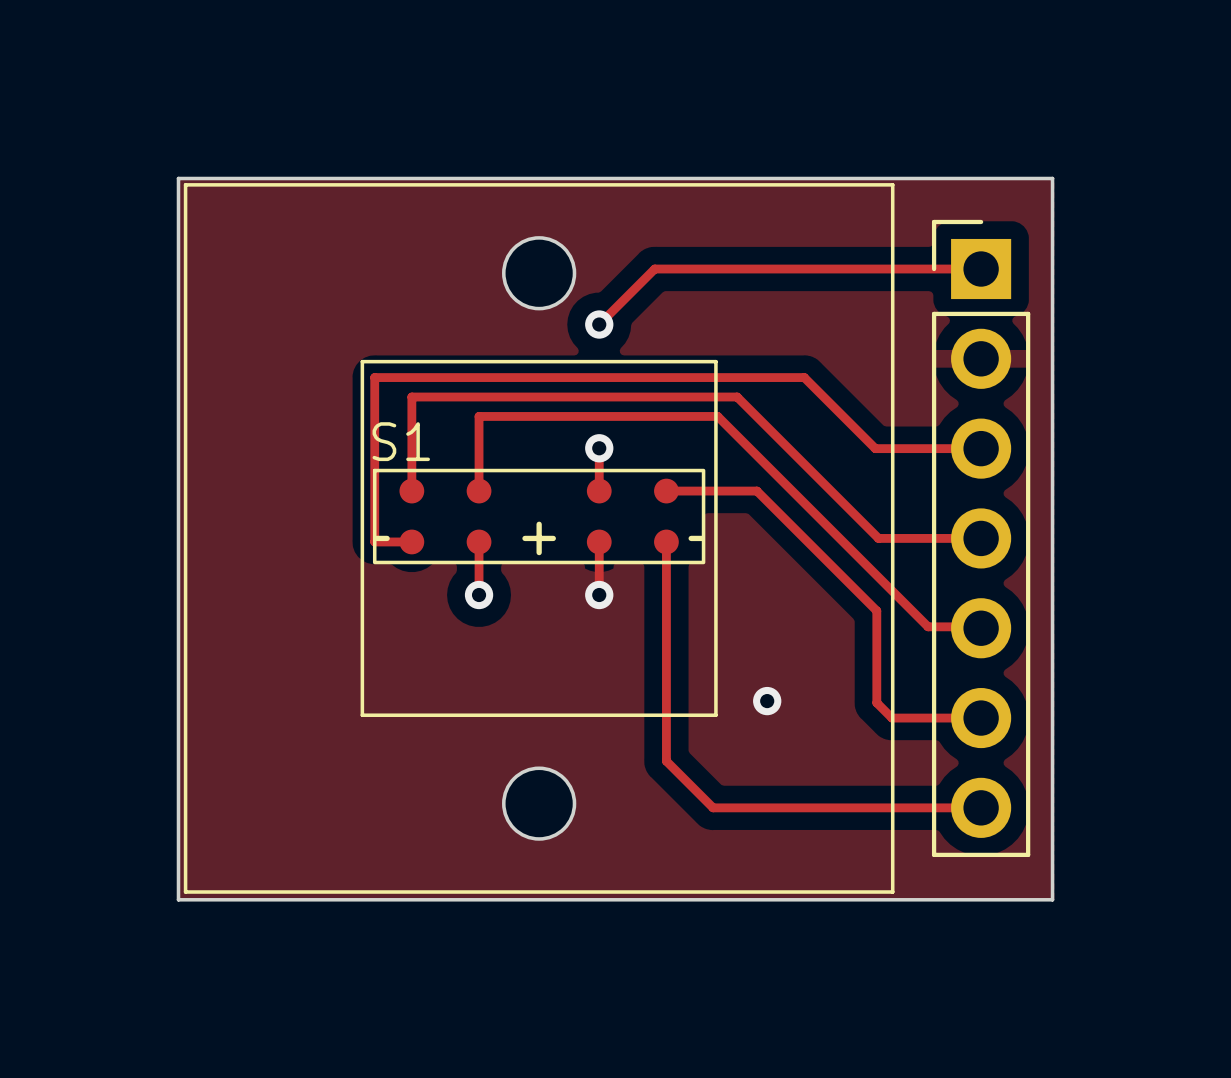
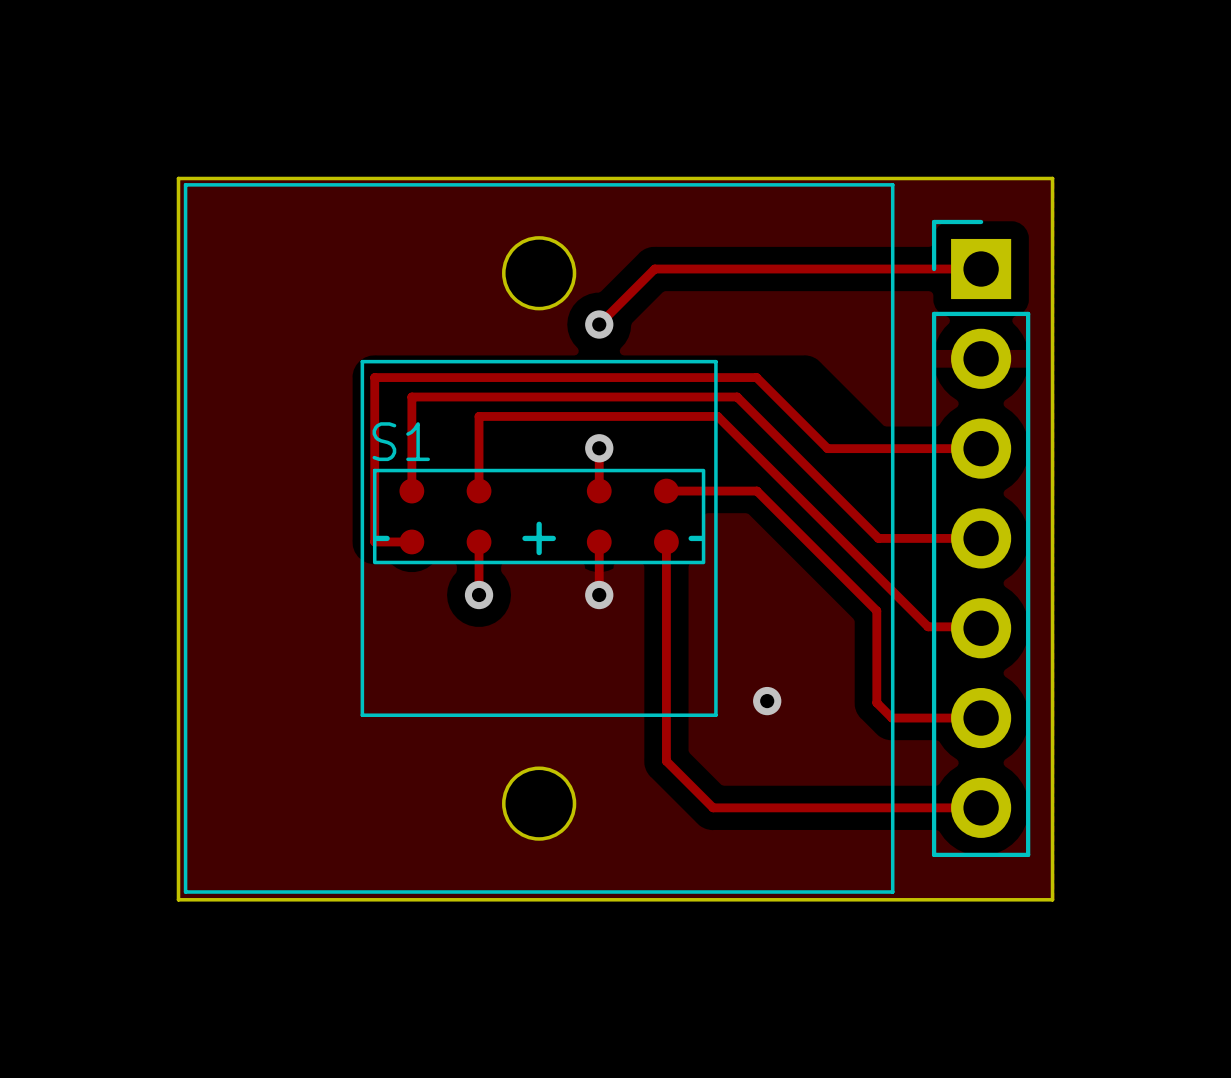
track: (756, 377) (804, 377) (875, 448) -> (756, 377) (827, 448) (875, 448)

